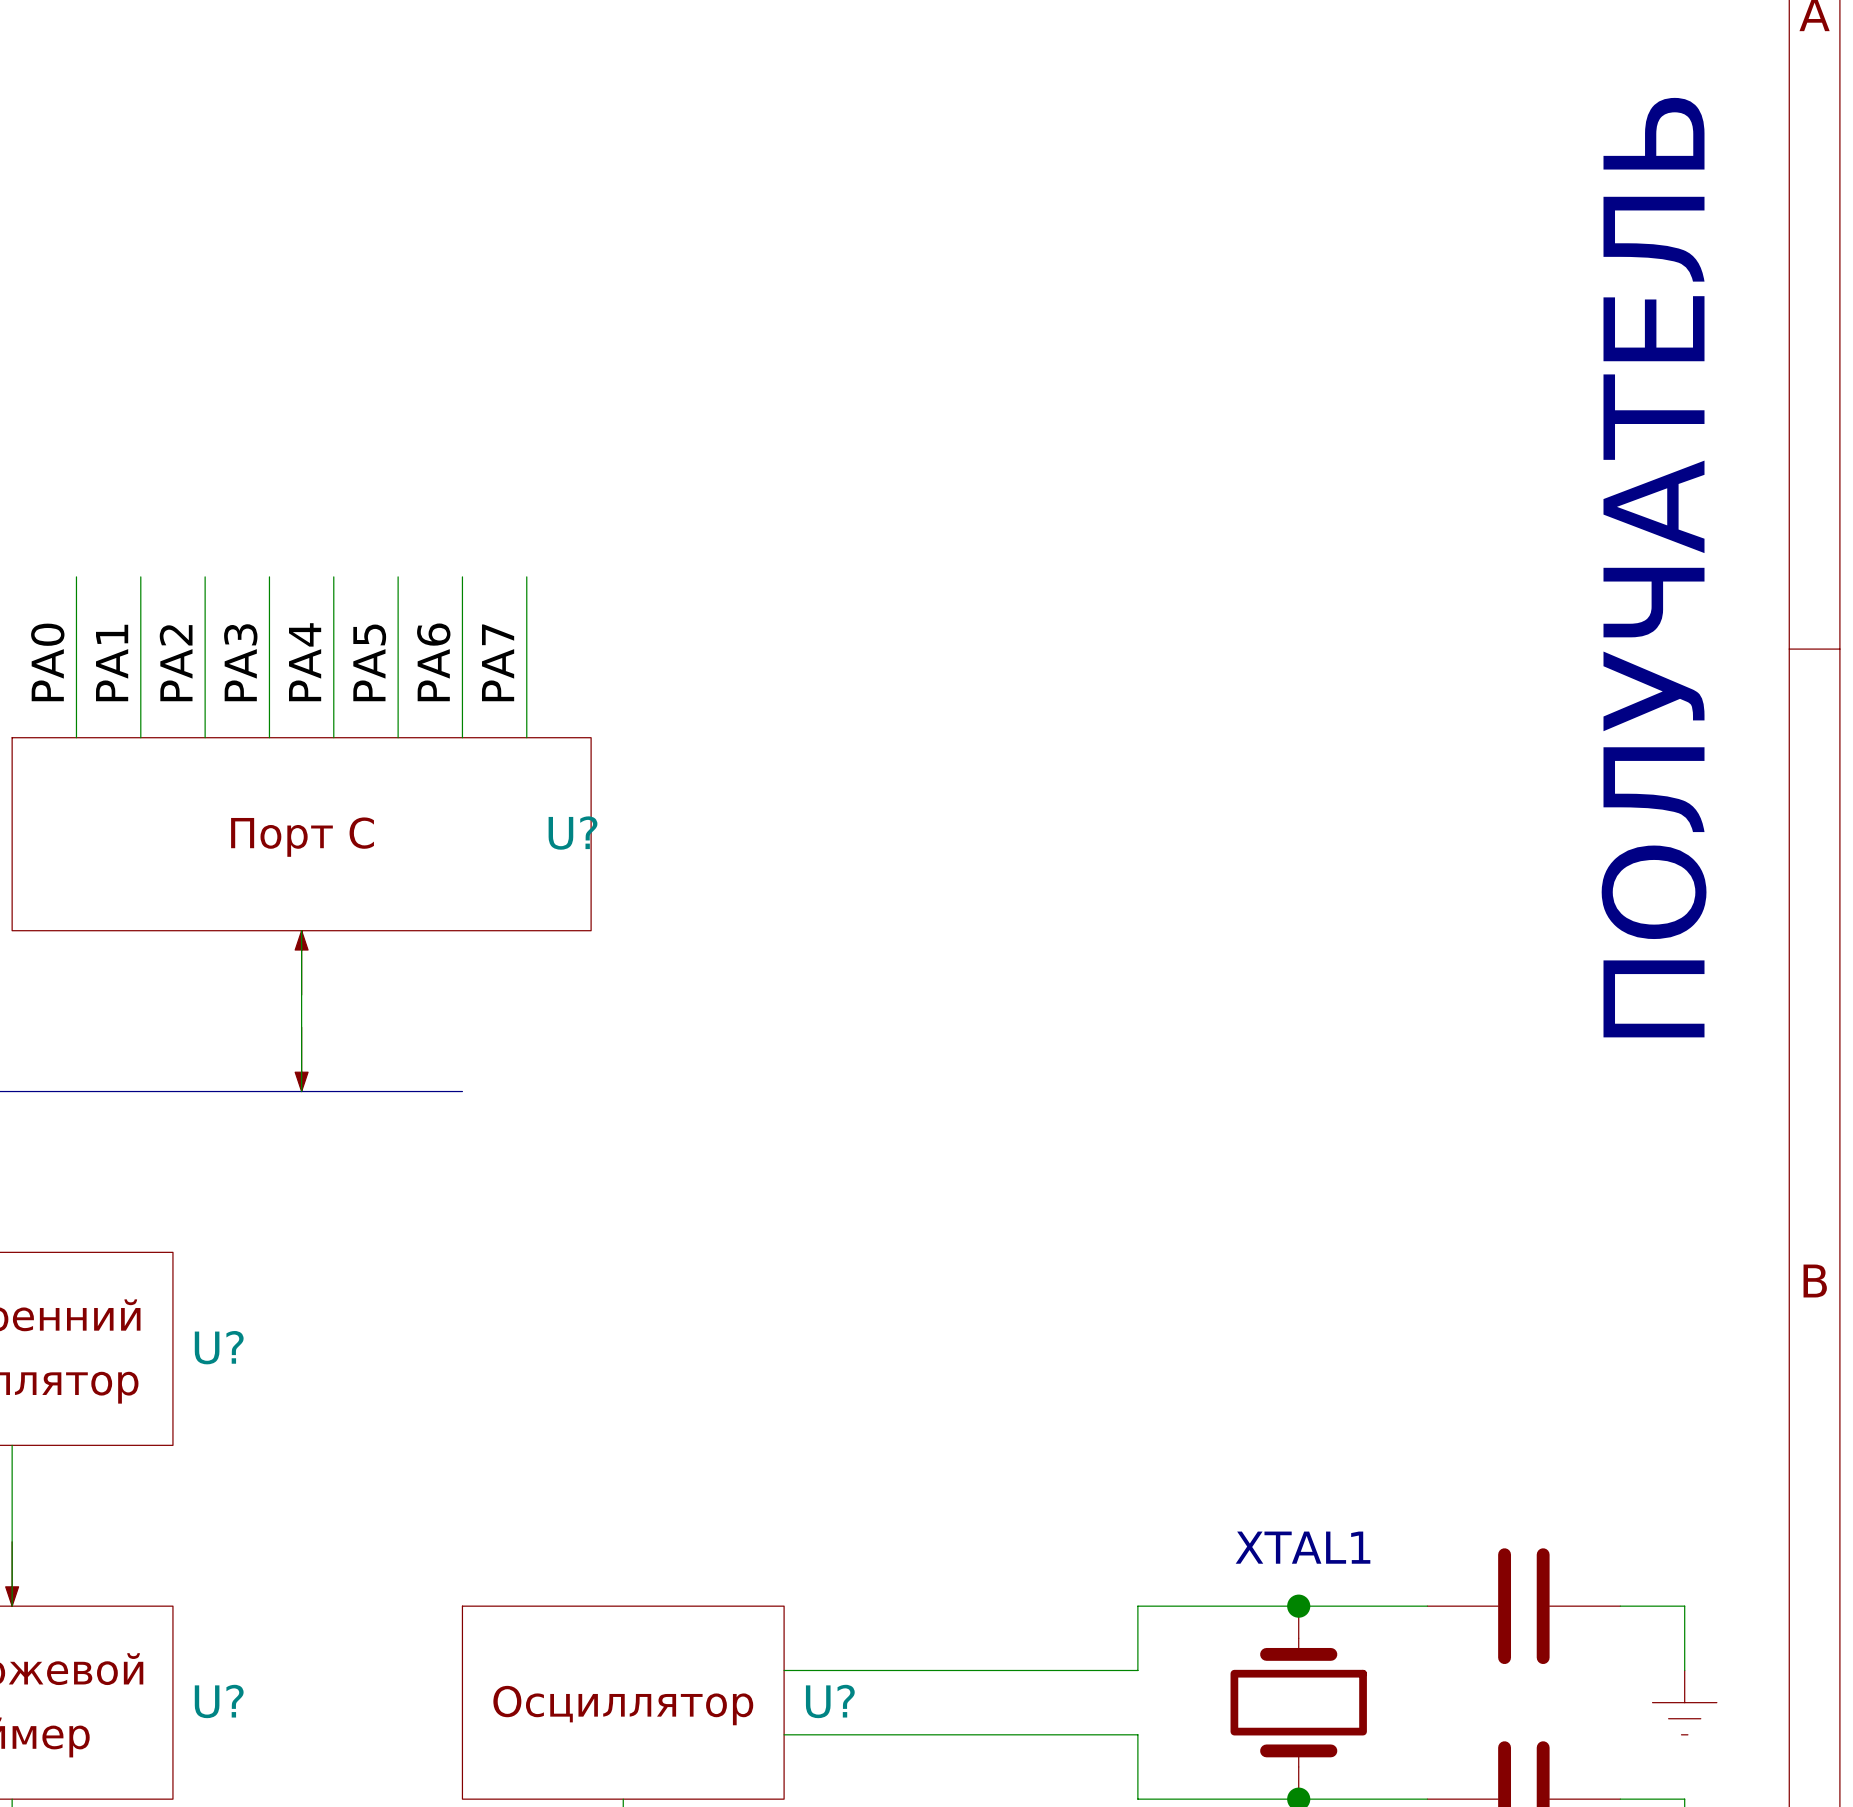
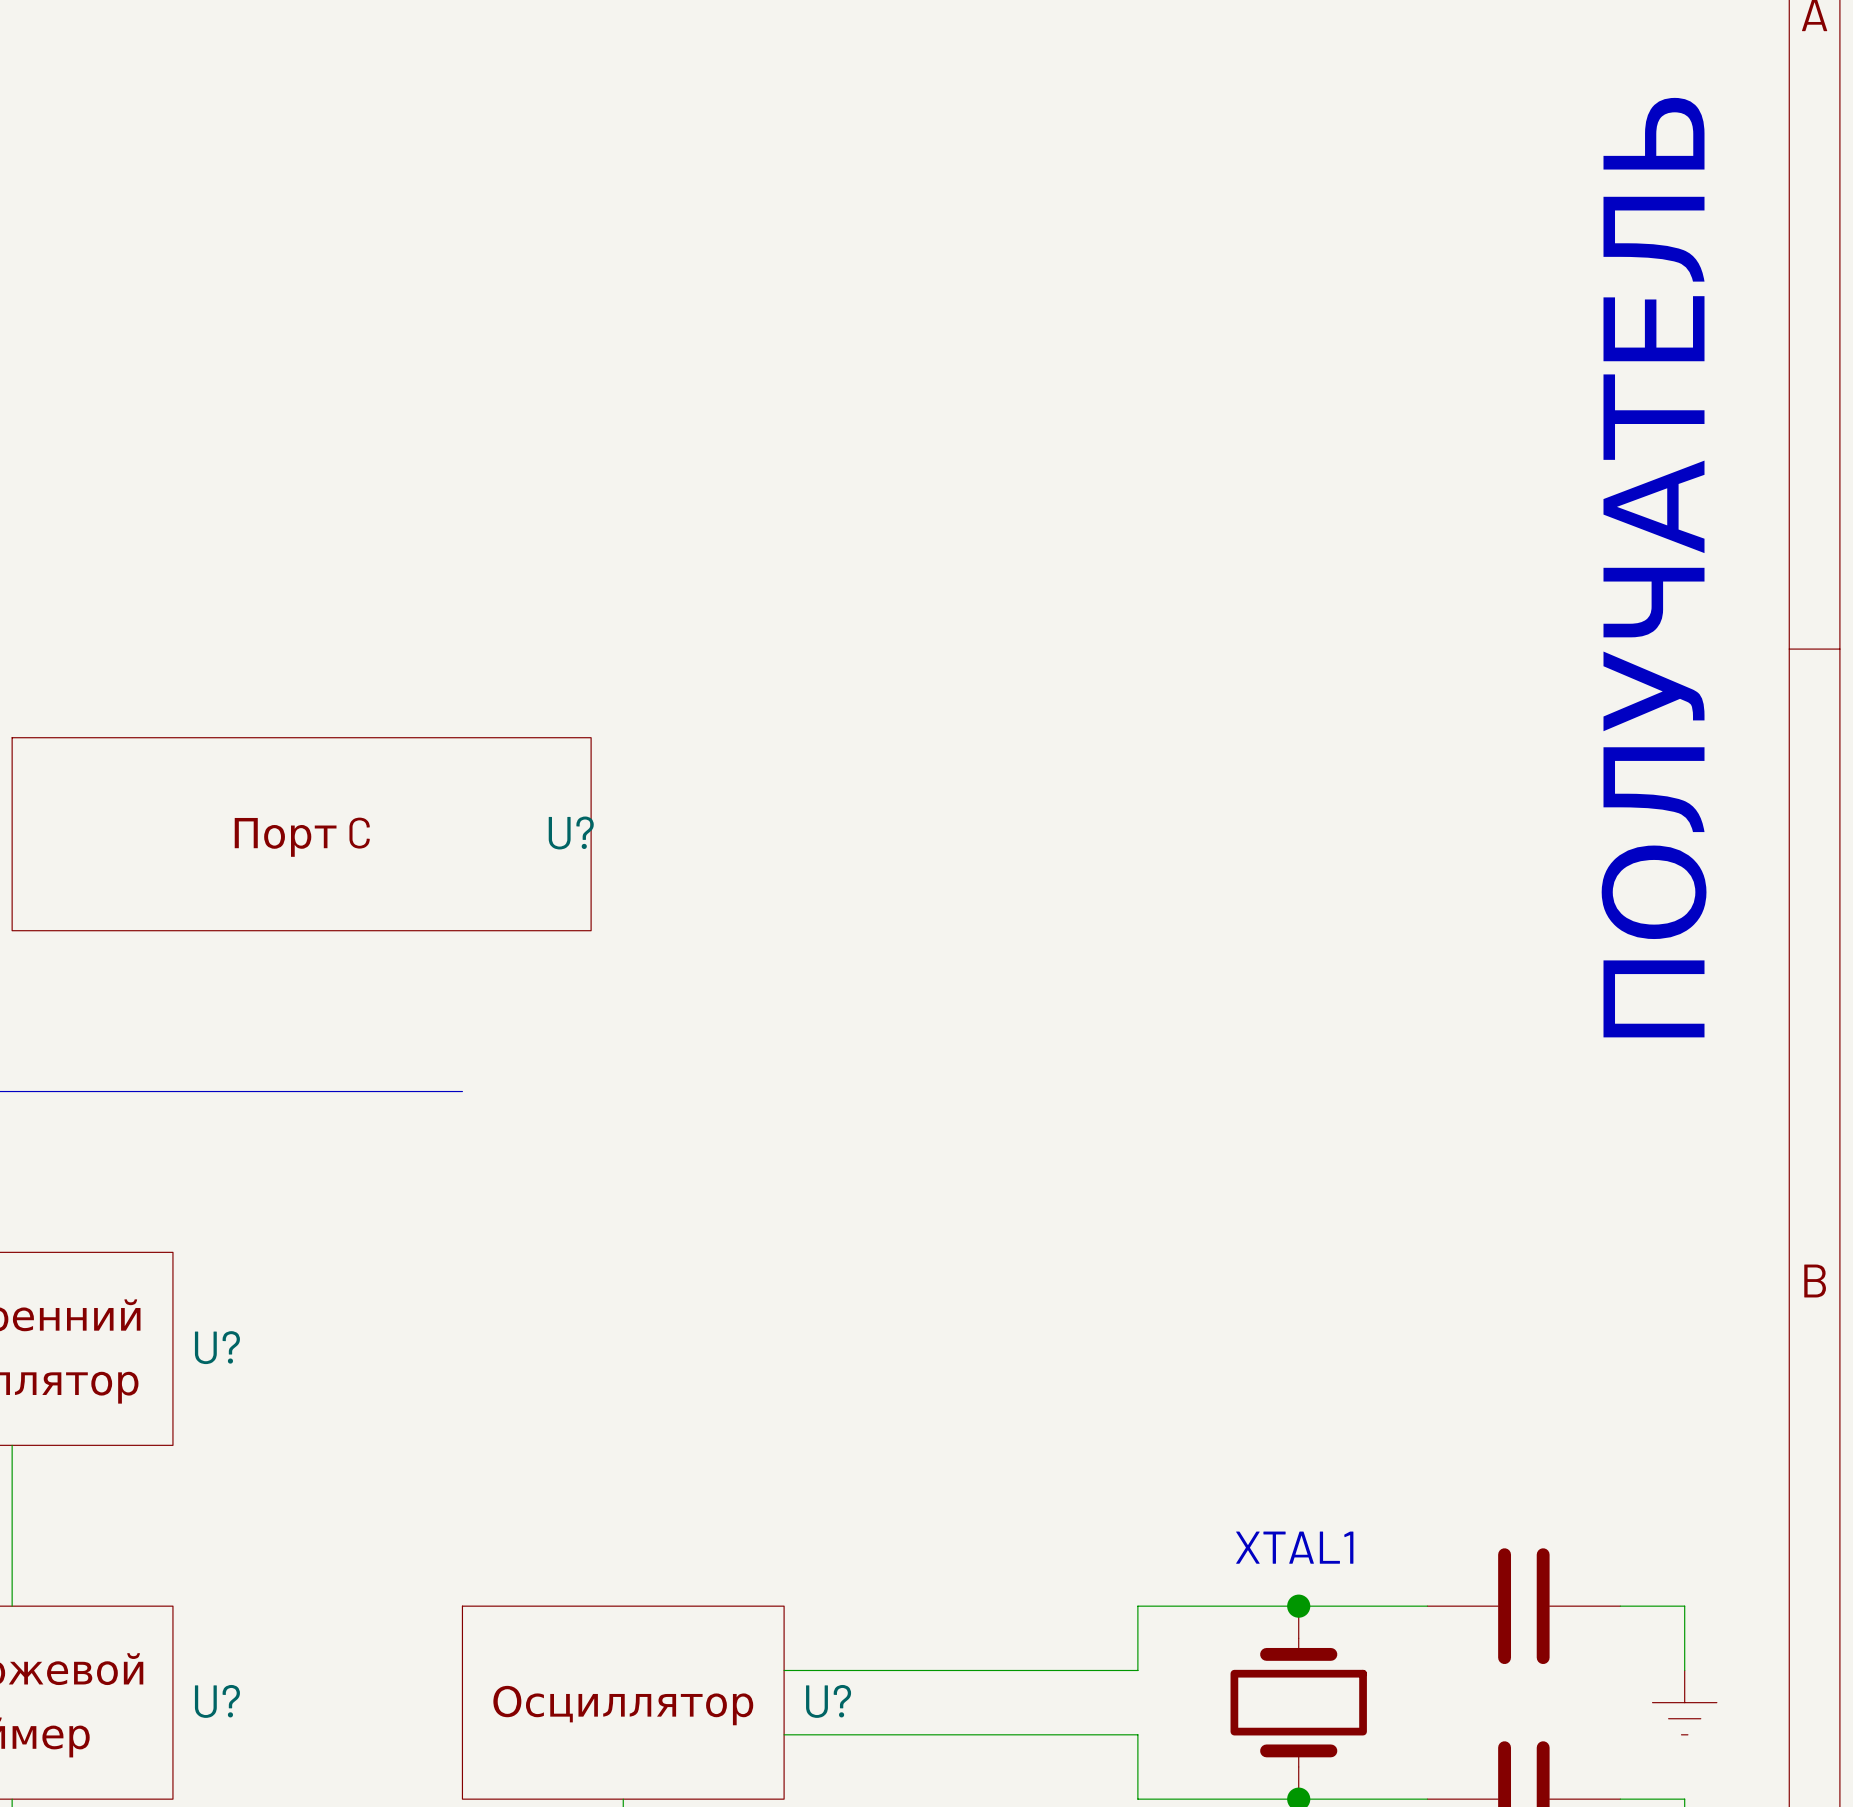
wire: (76, 576) (76, 737) -> none
wire: (140, 576) (140, 737) -> none
wire: (205, 576) (205, 737) -> none
wire: (269, 576) (269, 737) -> none
wire: (333, 576) (333, 737) -> none
wire: (398, 576) (398, 737) -> none
wire: (462, 576) (462, 737) -> none
wire: (526, 576) (526, 737) -> none
label: PA0 (47, 662) -> none
label: PA3 (240, 662) -> none
label: PA4 (305, 662) -> none
label: PA5 (369, 662) -> none
label: PA6 (433, 662) -> none
label: PA7 (498, 662) -> none
label: PA1 (112, 663) -> none
label: PA2 (176, 663) -> none
wire: (301, 930) (301, 1091) -> none
power symbol: (301, 962) -> none
power symbol: (301, 1059) -> none
power symbol: (12, 1573) -> none

